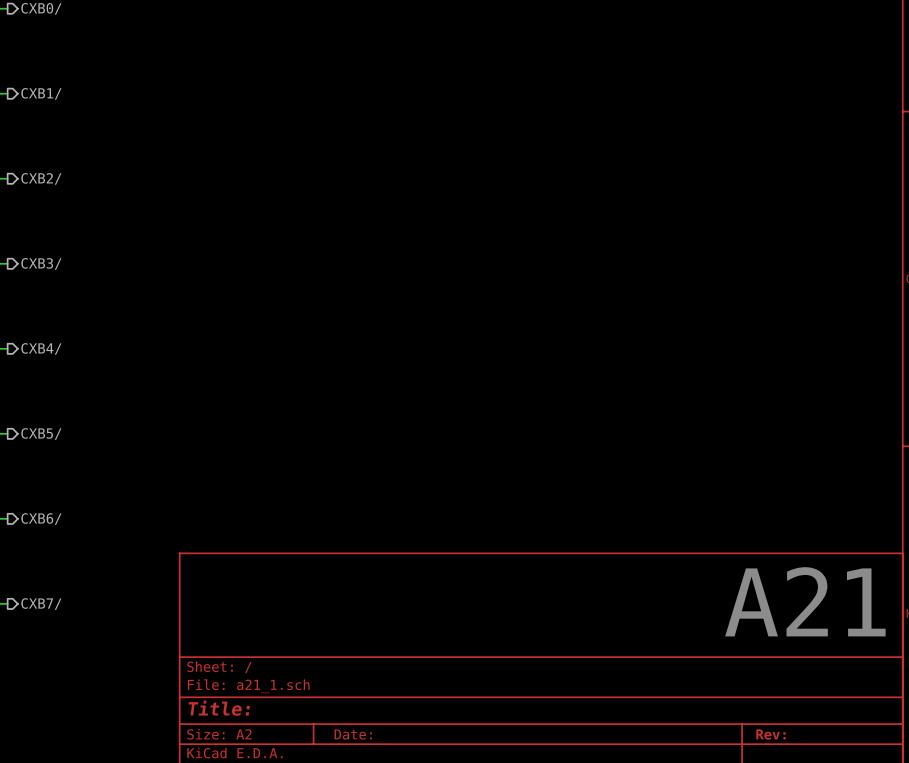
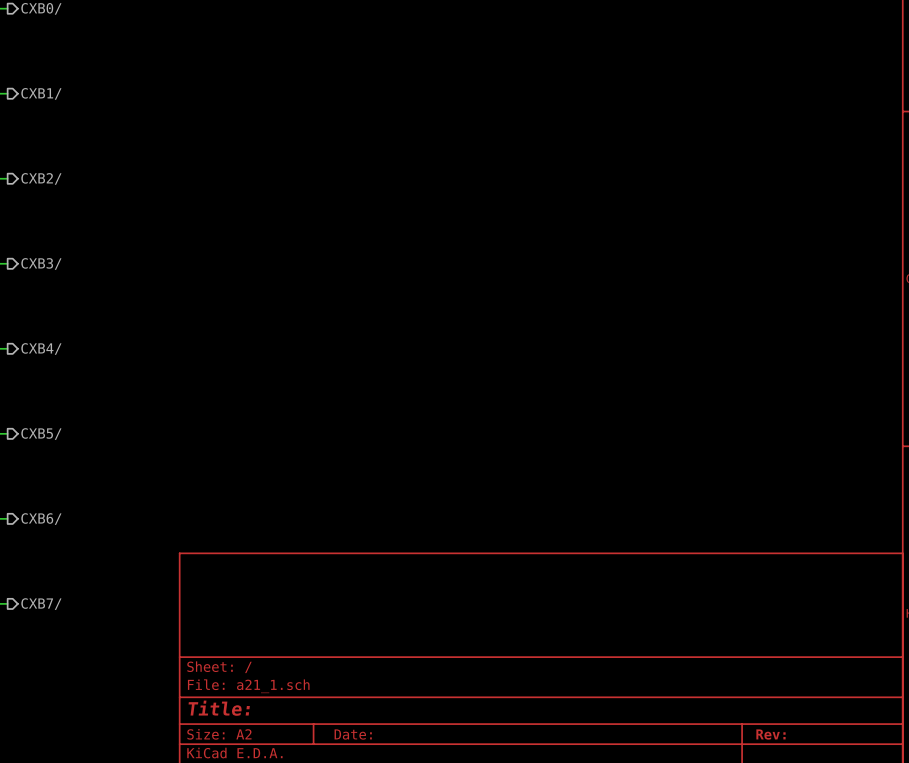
text: A21 (805, 601) -> none

